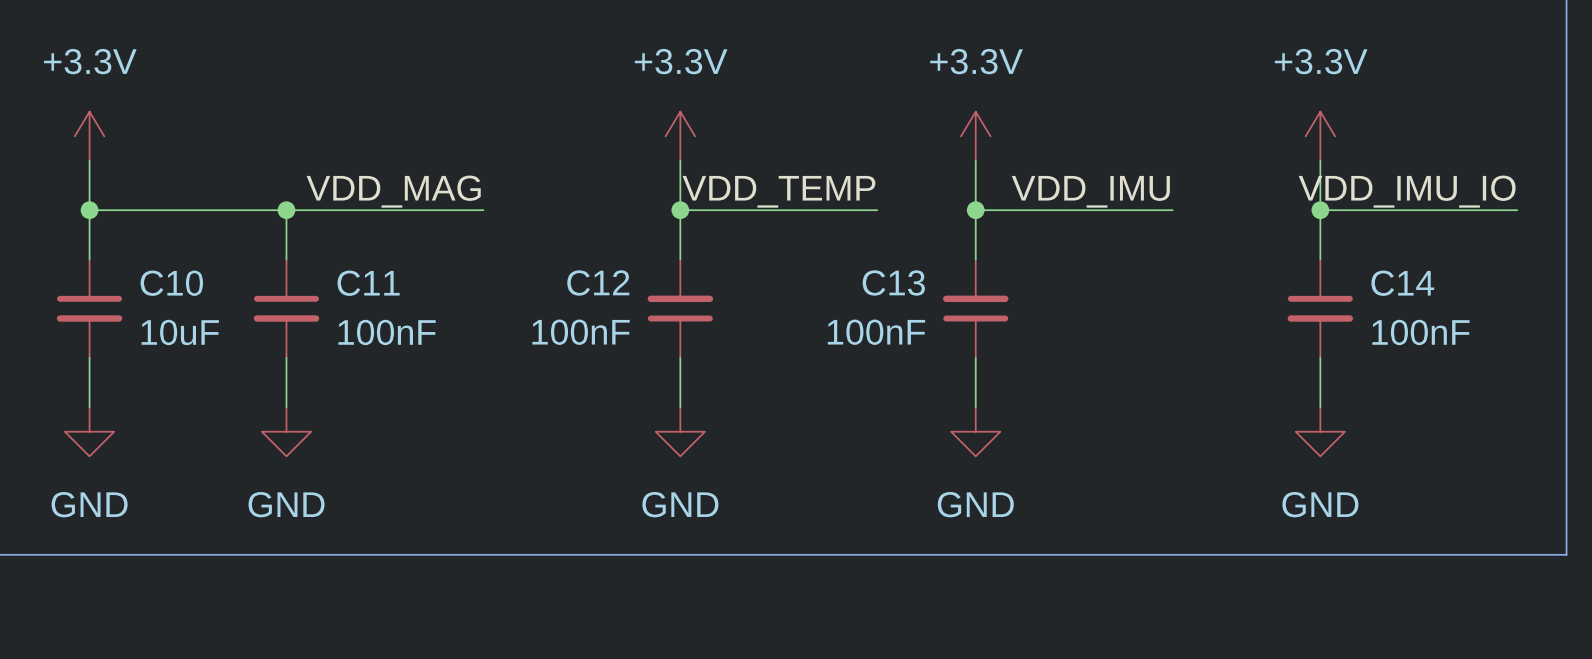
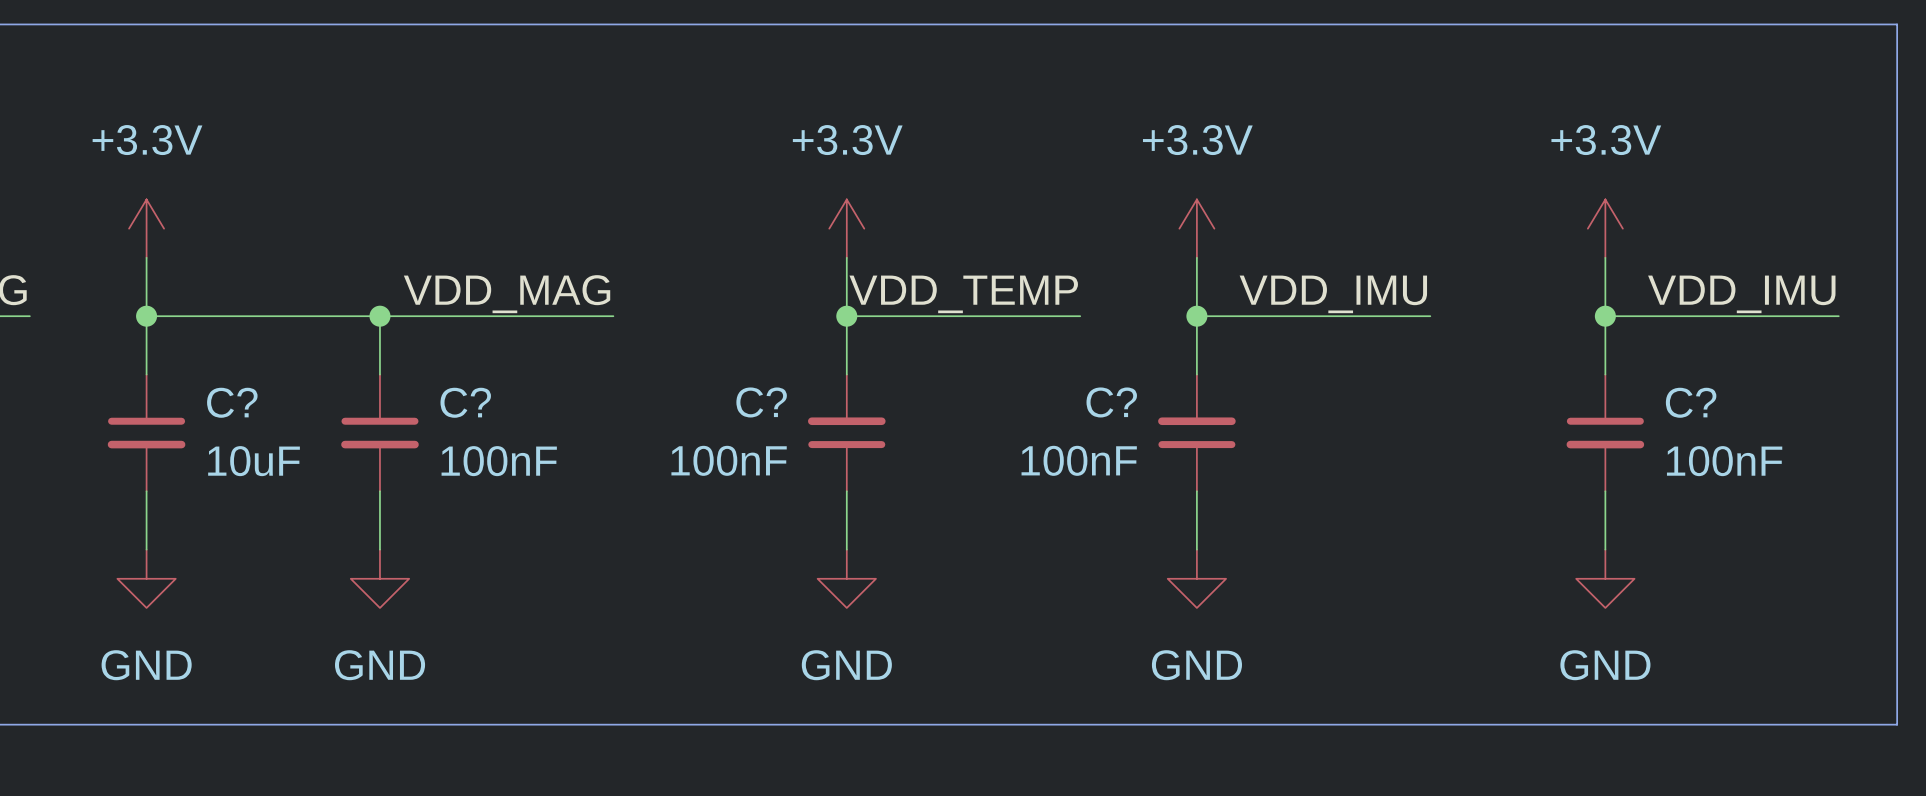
label: VDD_IMU_IO (1407, 191) -> VDD_IMU (1741, 294)
C12 name: C12 (598, 282) -> C? (761, 402)
C13 name: C13 (893, 282) -> C? (1111, 402)
C10 name: C10 (171, 283) -> C? (232, 402)
C11 name: C11 (368, 283) -> C? (465, 402)
C14 name: C14 (1402, 283) -> C? (1691, 402)

